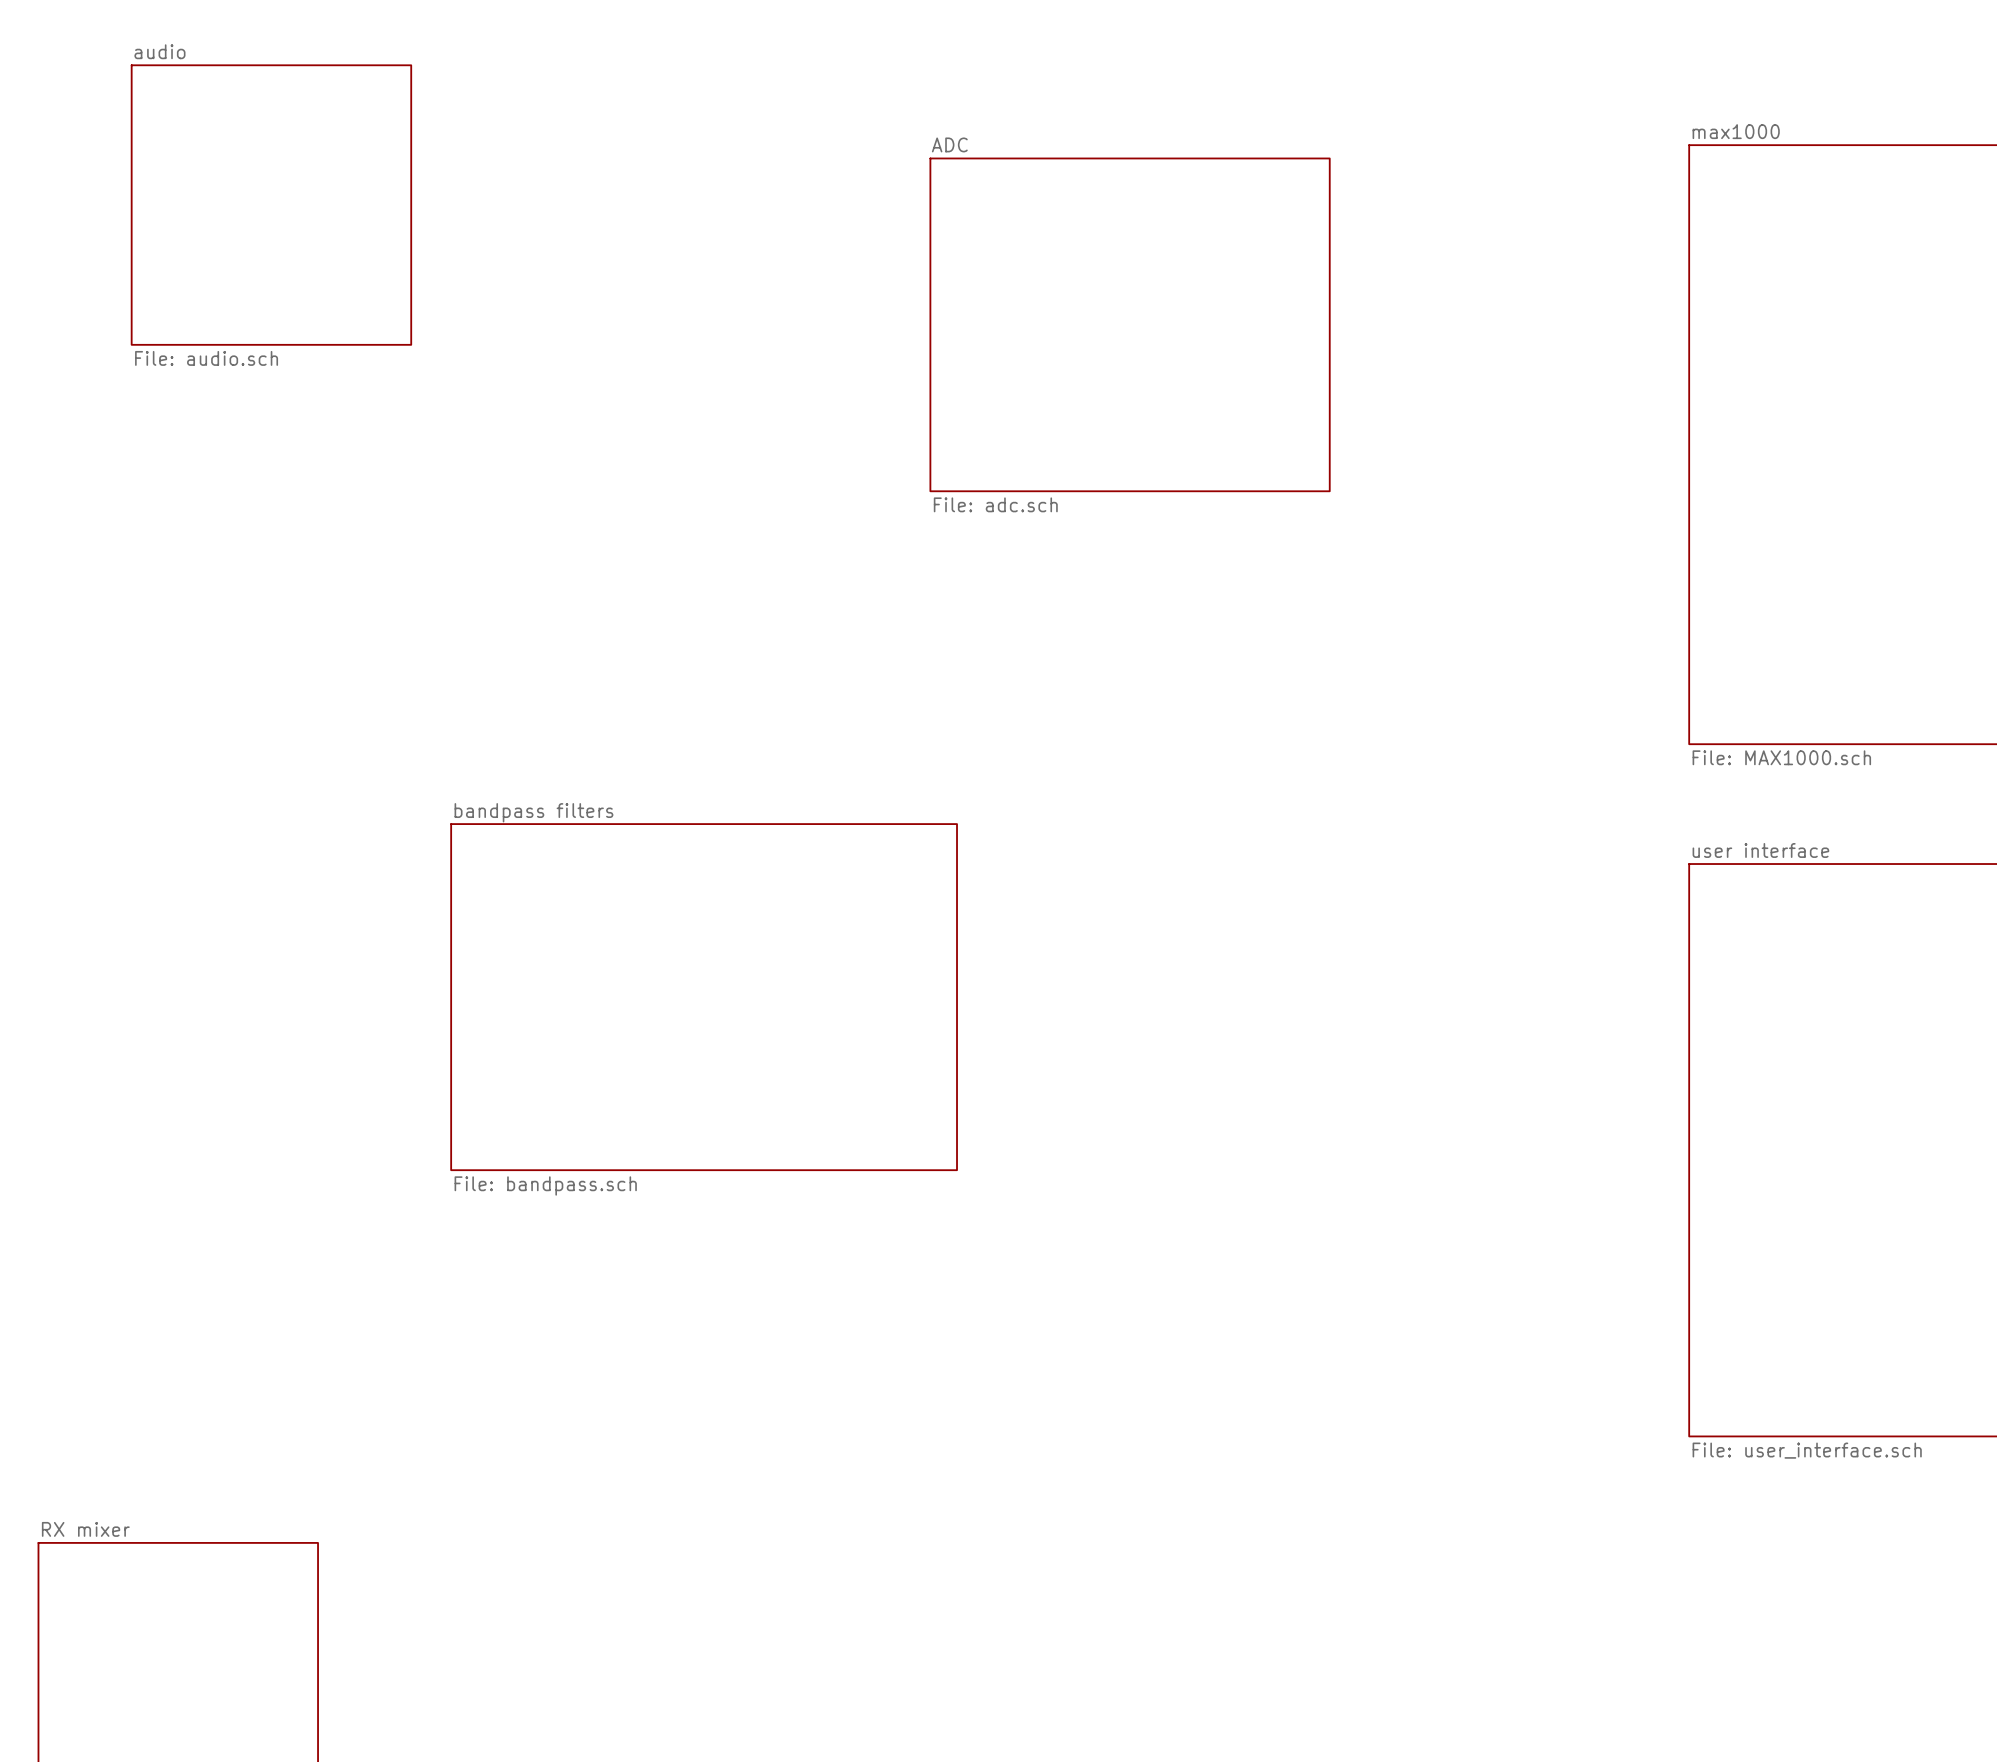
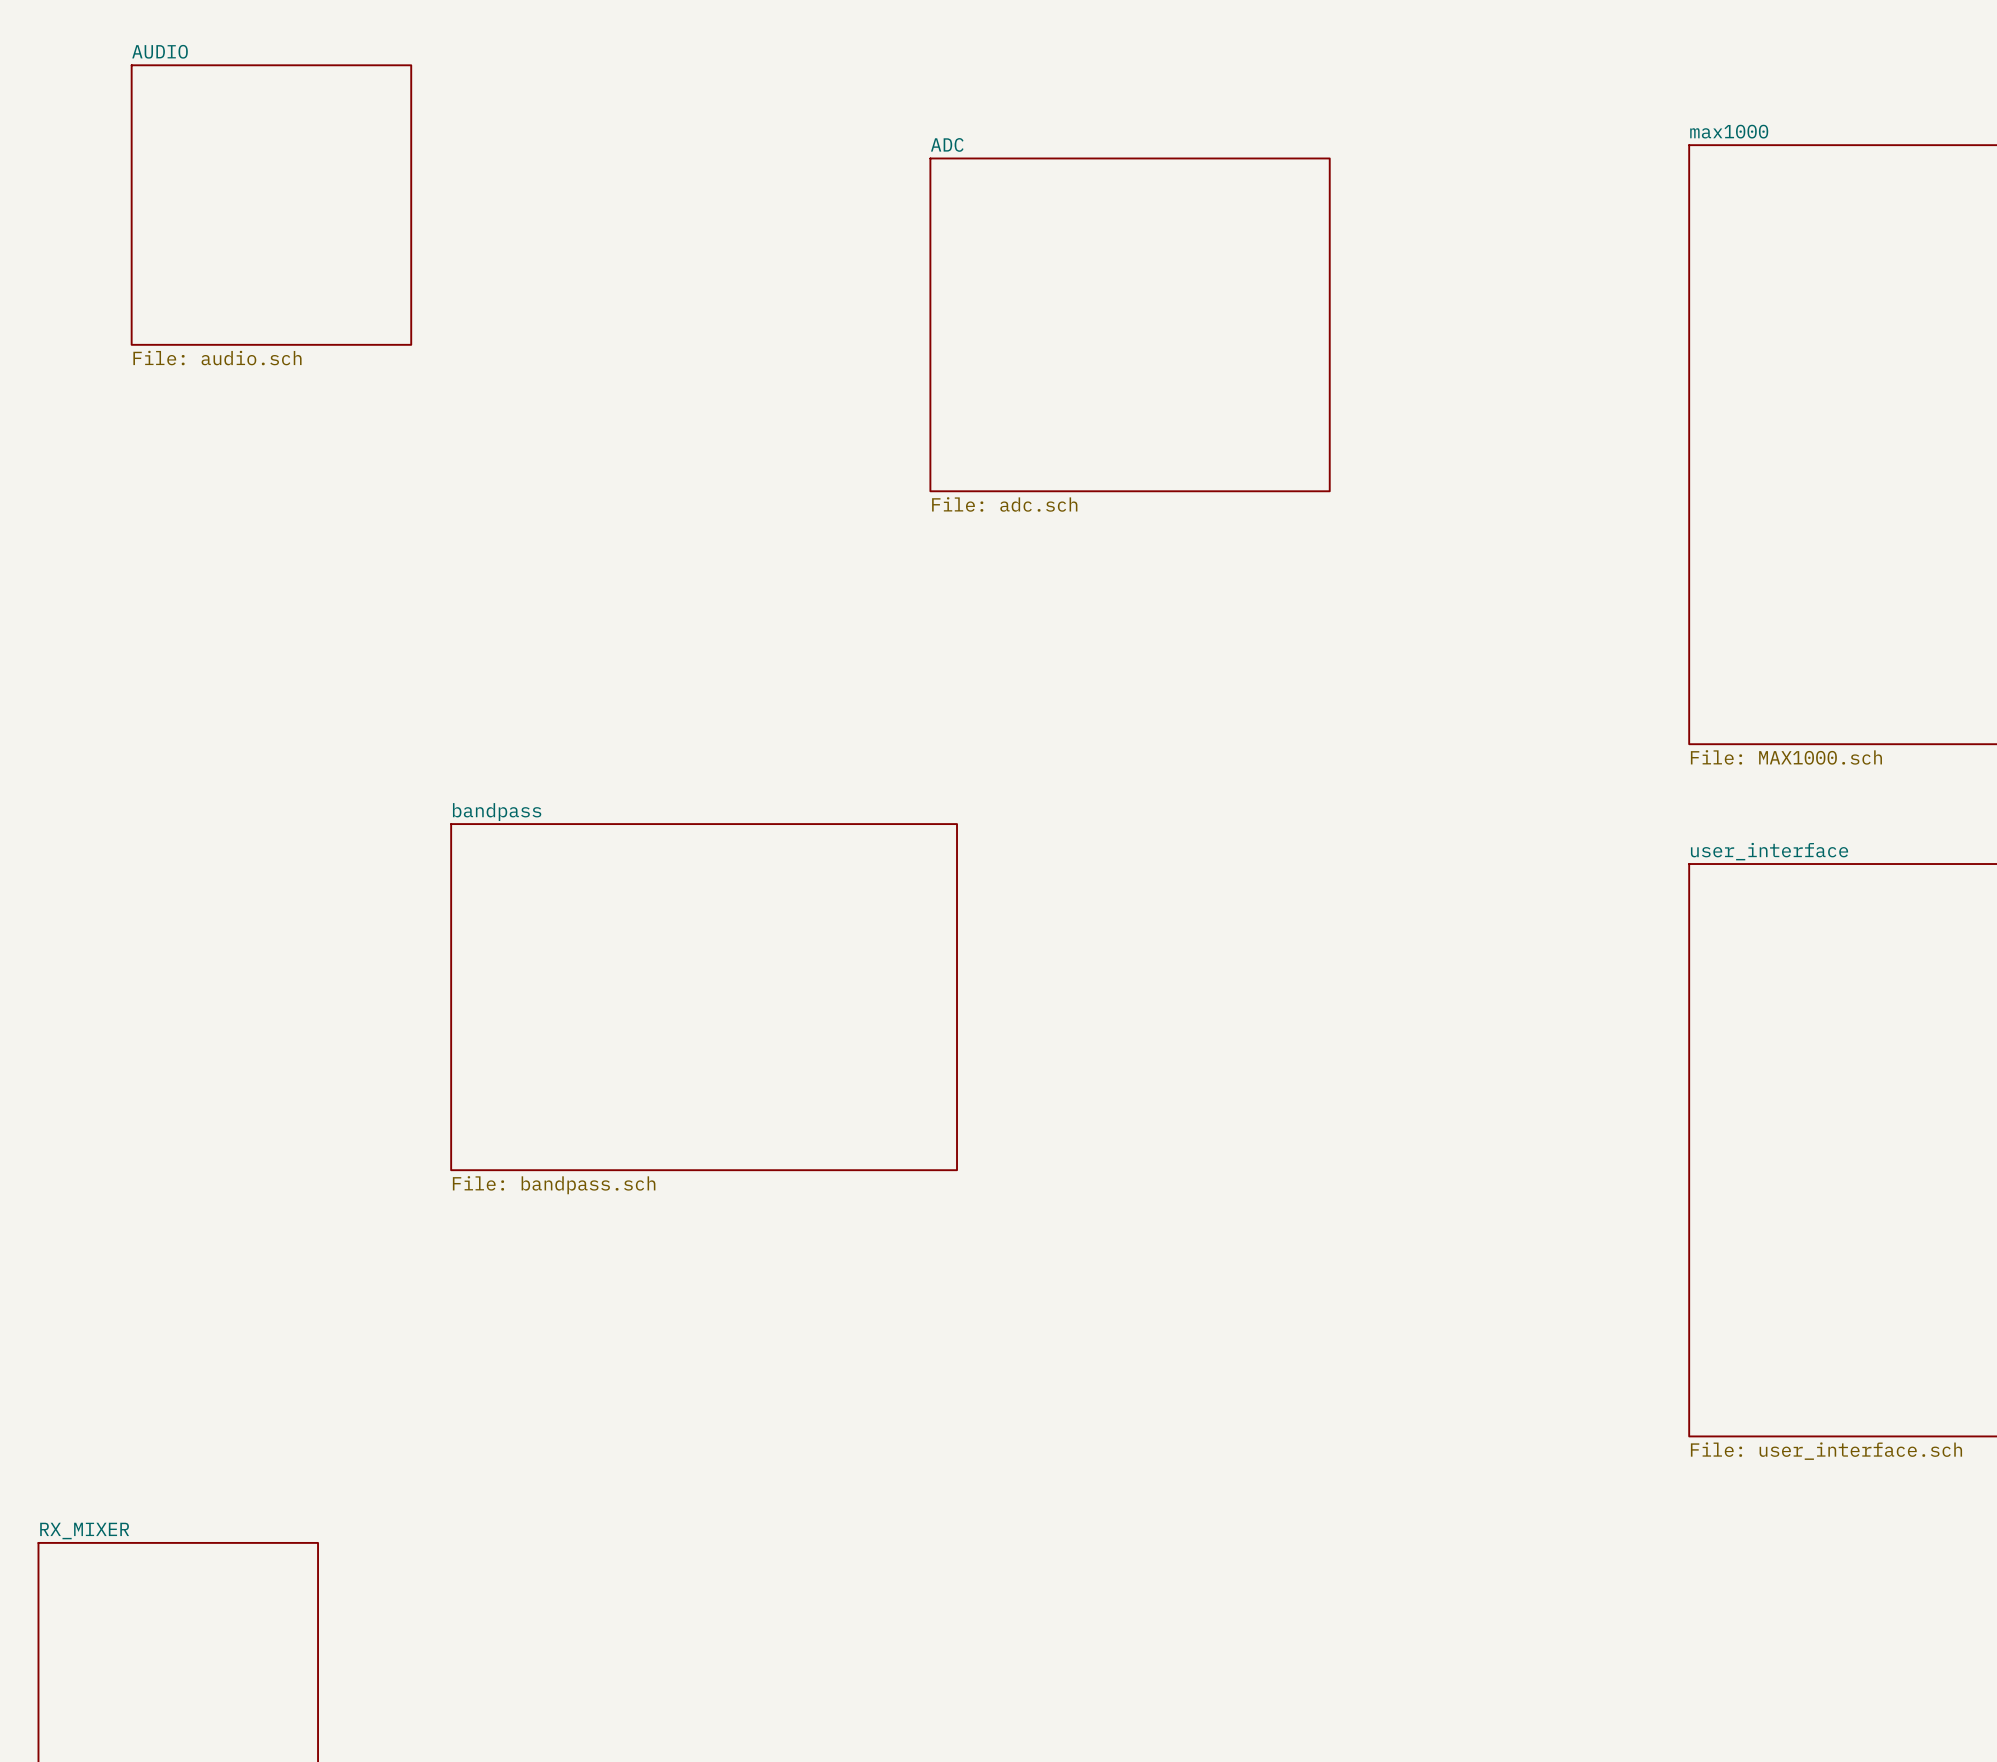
sheet audio name: audio (159, 51) -> AUDIO (160, 51)
sheet bandpass filters name: bandpass filters (533, 812) -> bandpass (497, 812)
sheet user interface name: user interface (1760, 850) -> user_interface (1769, 851)
sheet RX mixer name: RX mixer (85, 1529) -> RX_MIXER (84, 1531)

